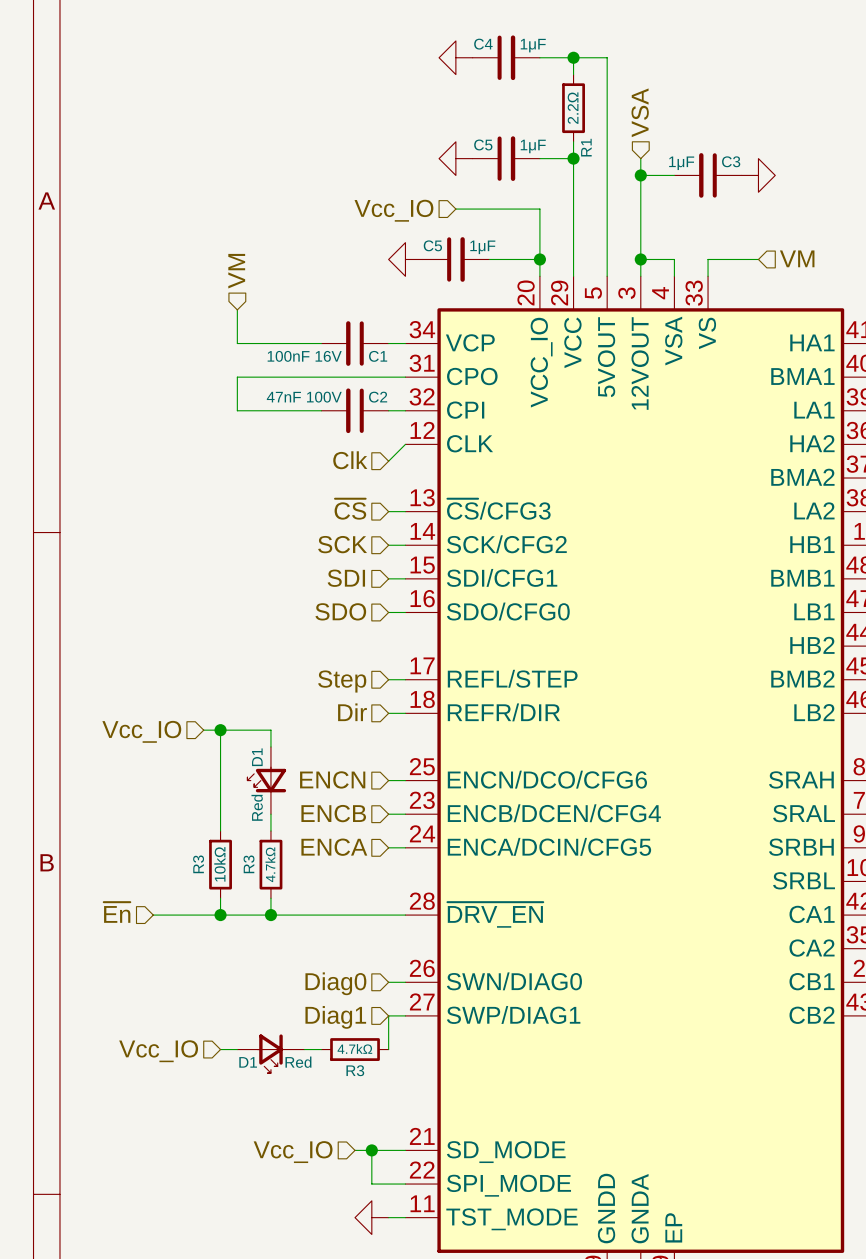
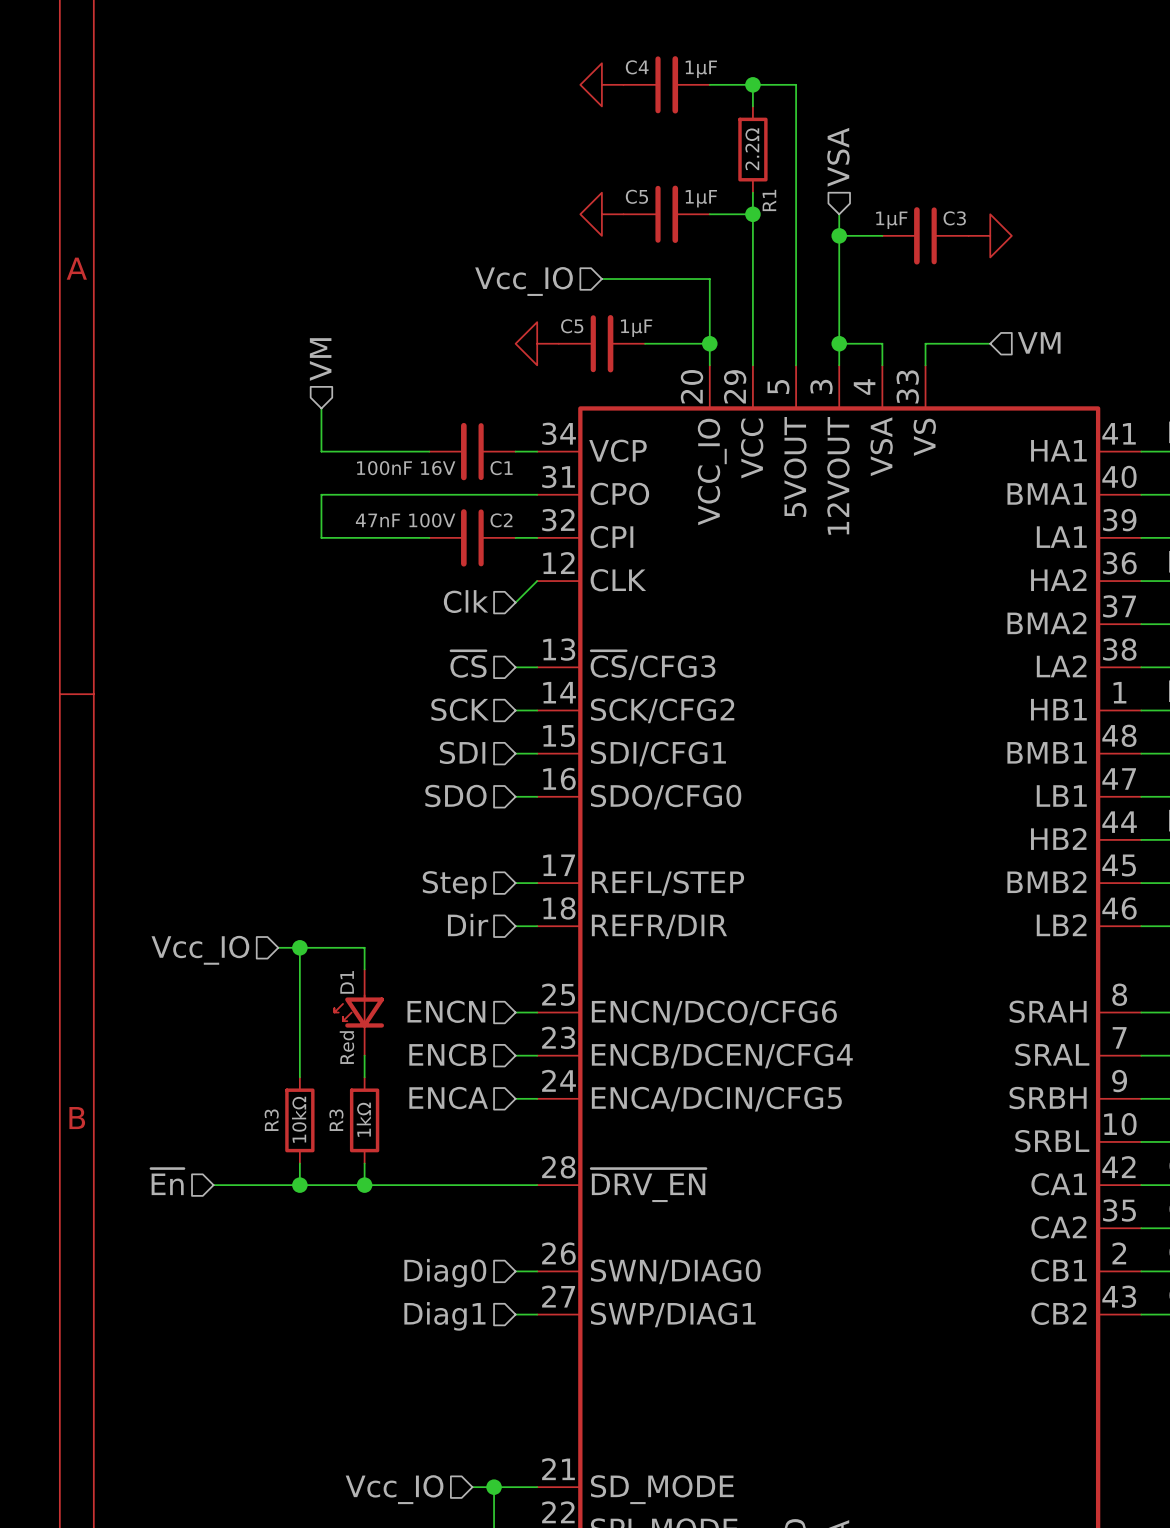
R3 value: 4.7kΩ (270, 864) -> 1kΩ (363, 1119)
wire: (388, 1015) (388, 1049) -> none
wire: (220, 1049) (237, 1049) -> none
wire: (304, 1049) (321, 1049) -> none
R3: 4.7kΩ (355, 1049) -> none
hierarchical label: Vcc_IO (158, 1051) -> none
D1: Red (270, 1053) -> none

